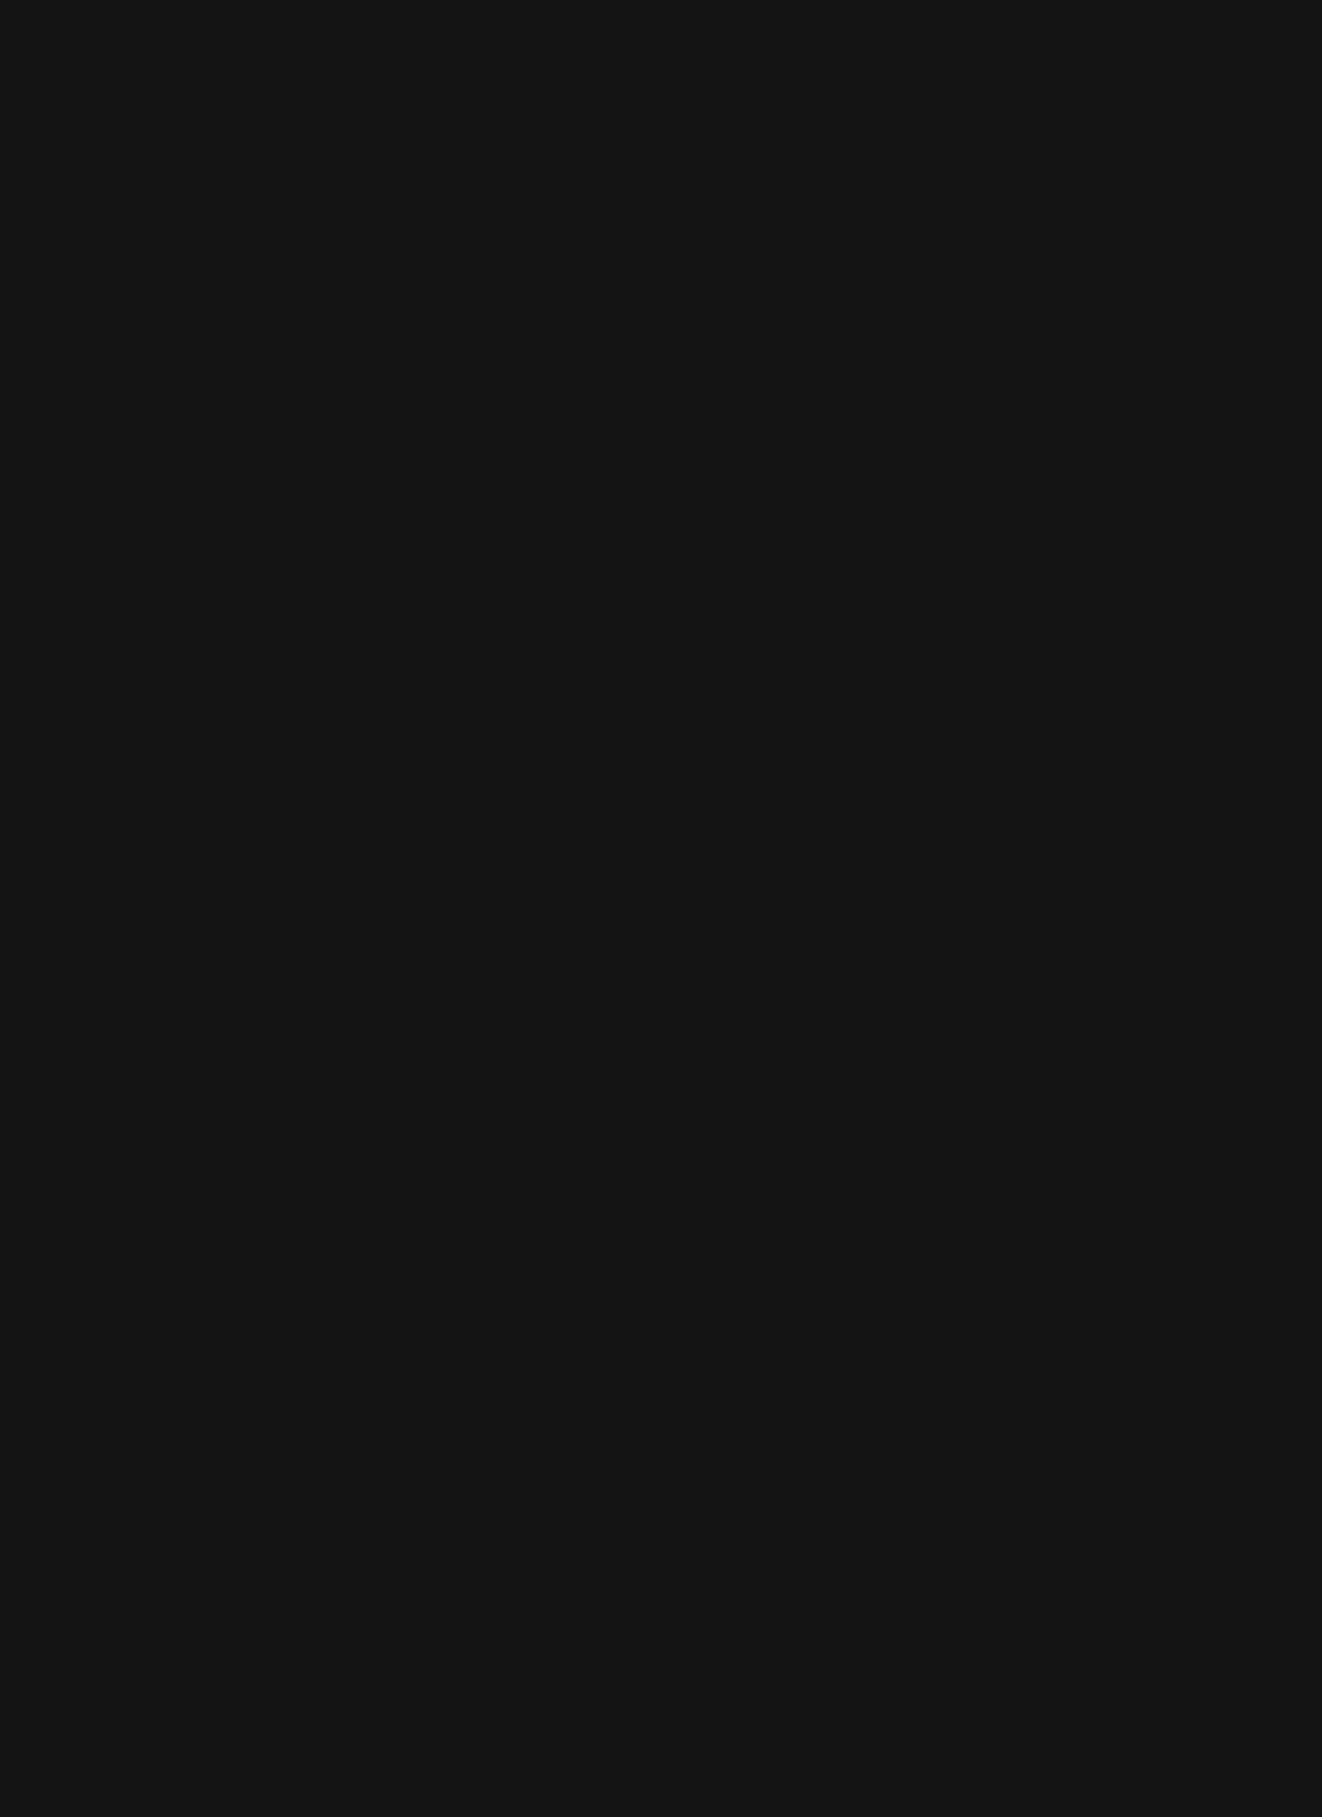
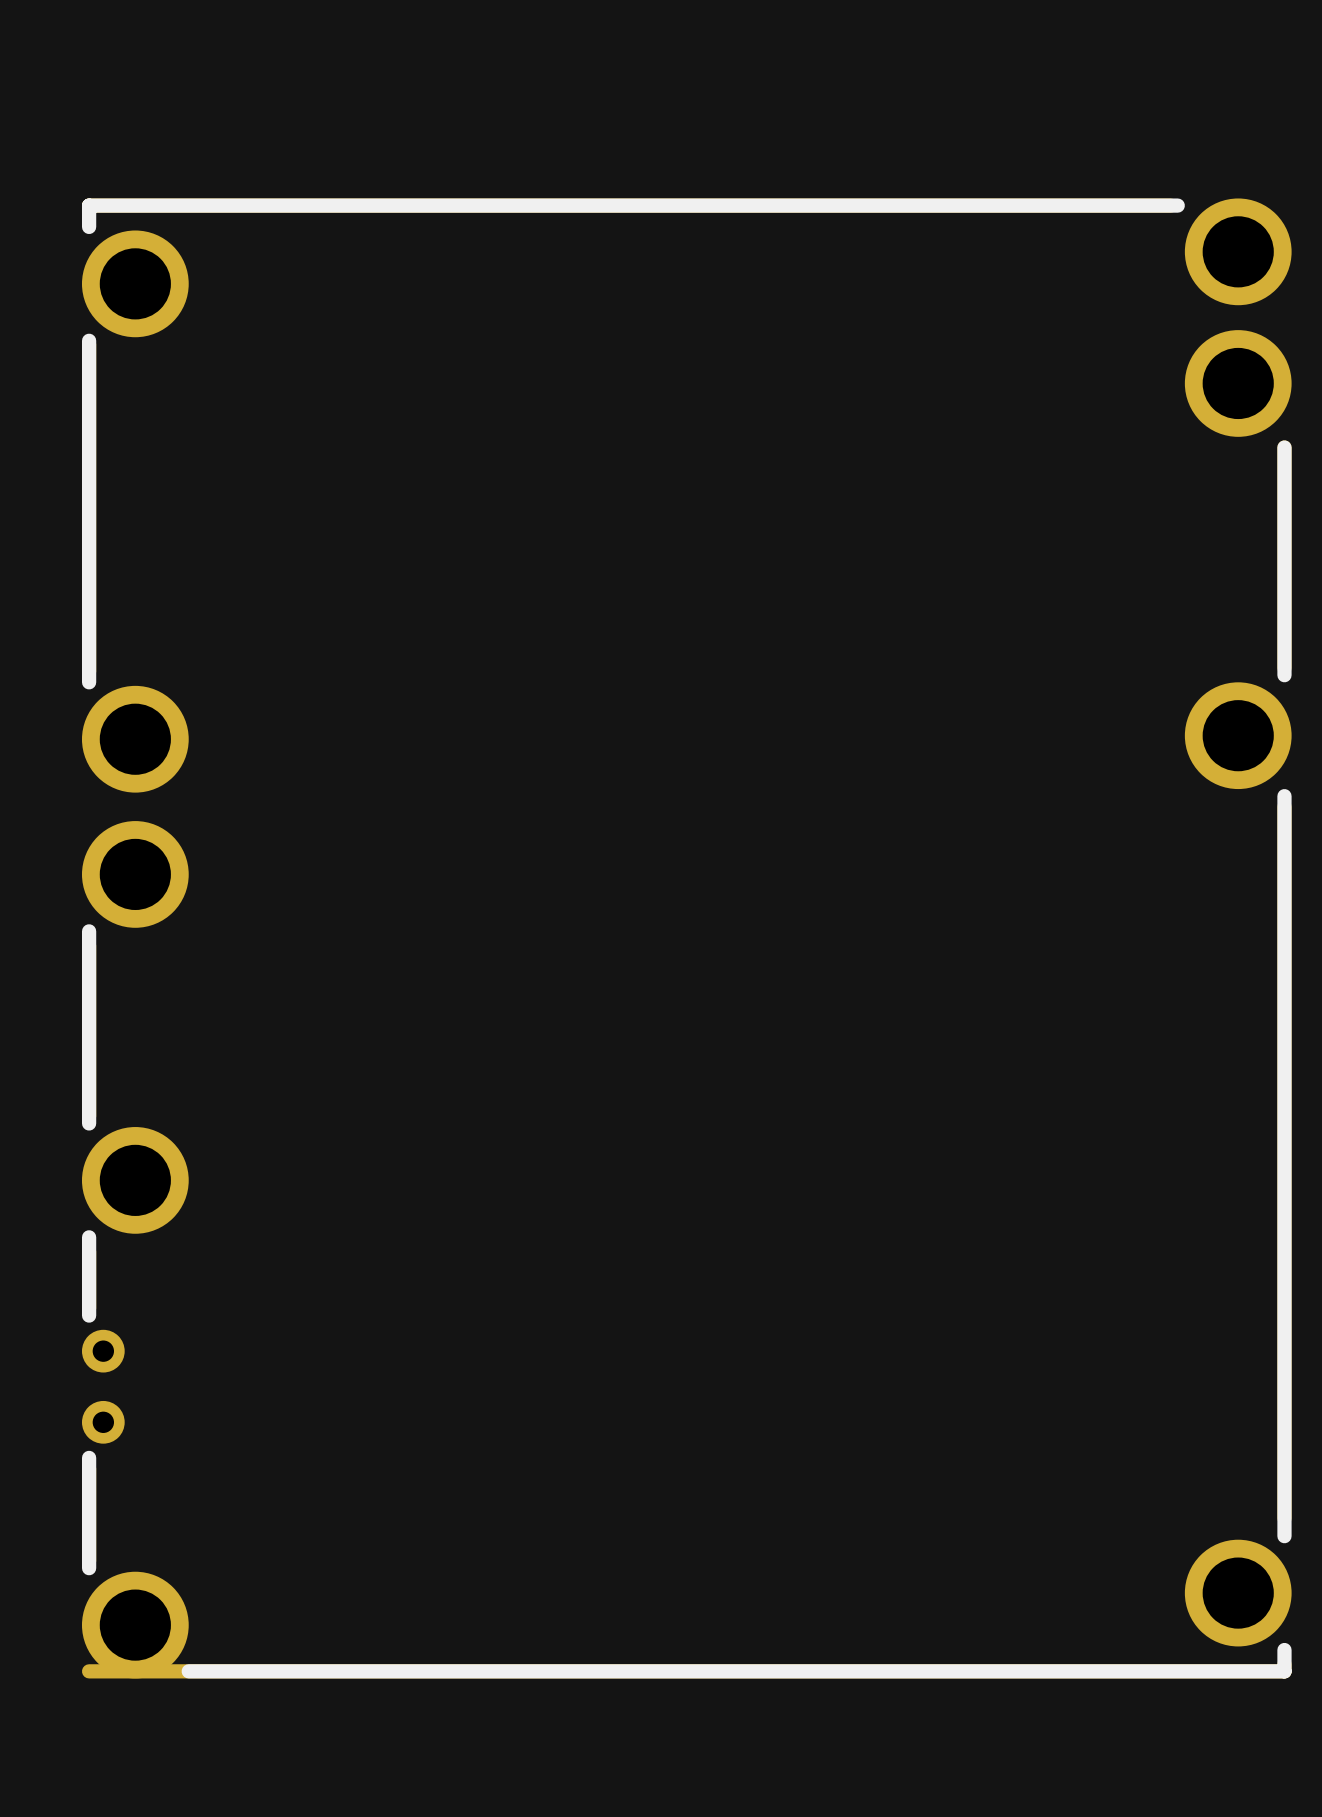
part: none -> (686, 938)

